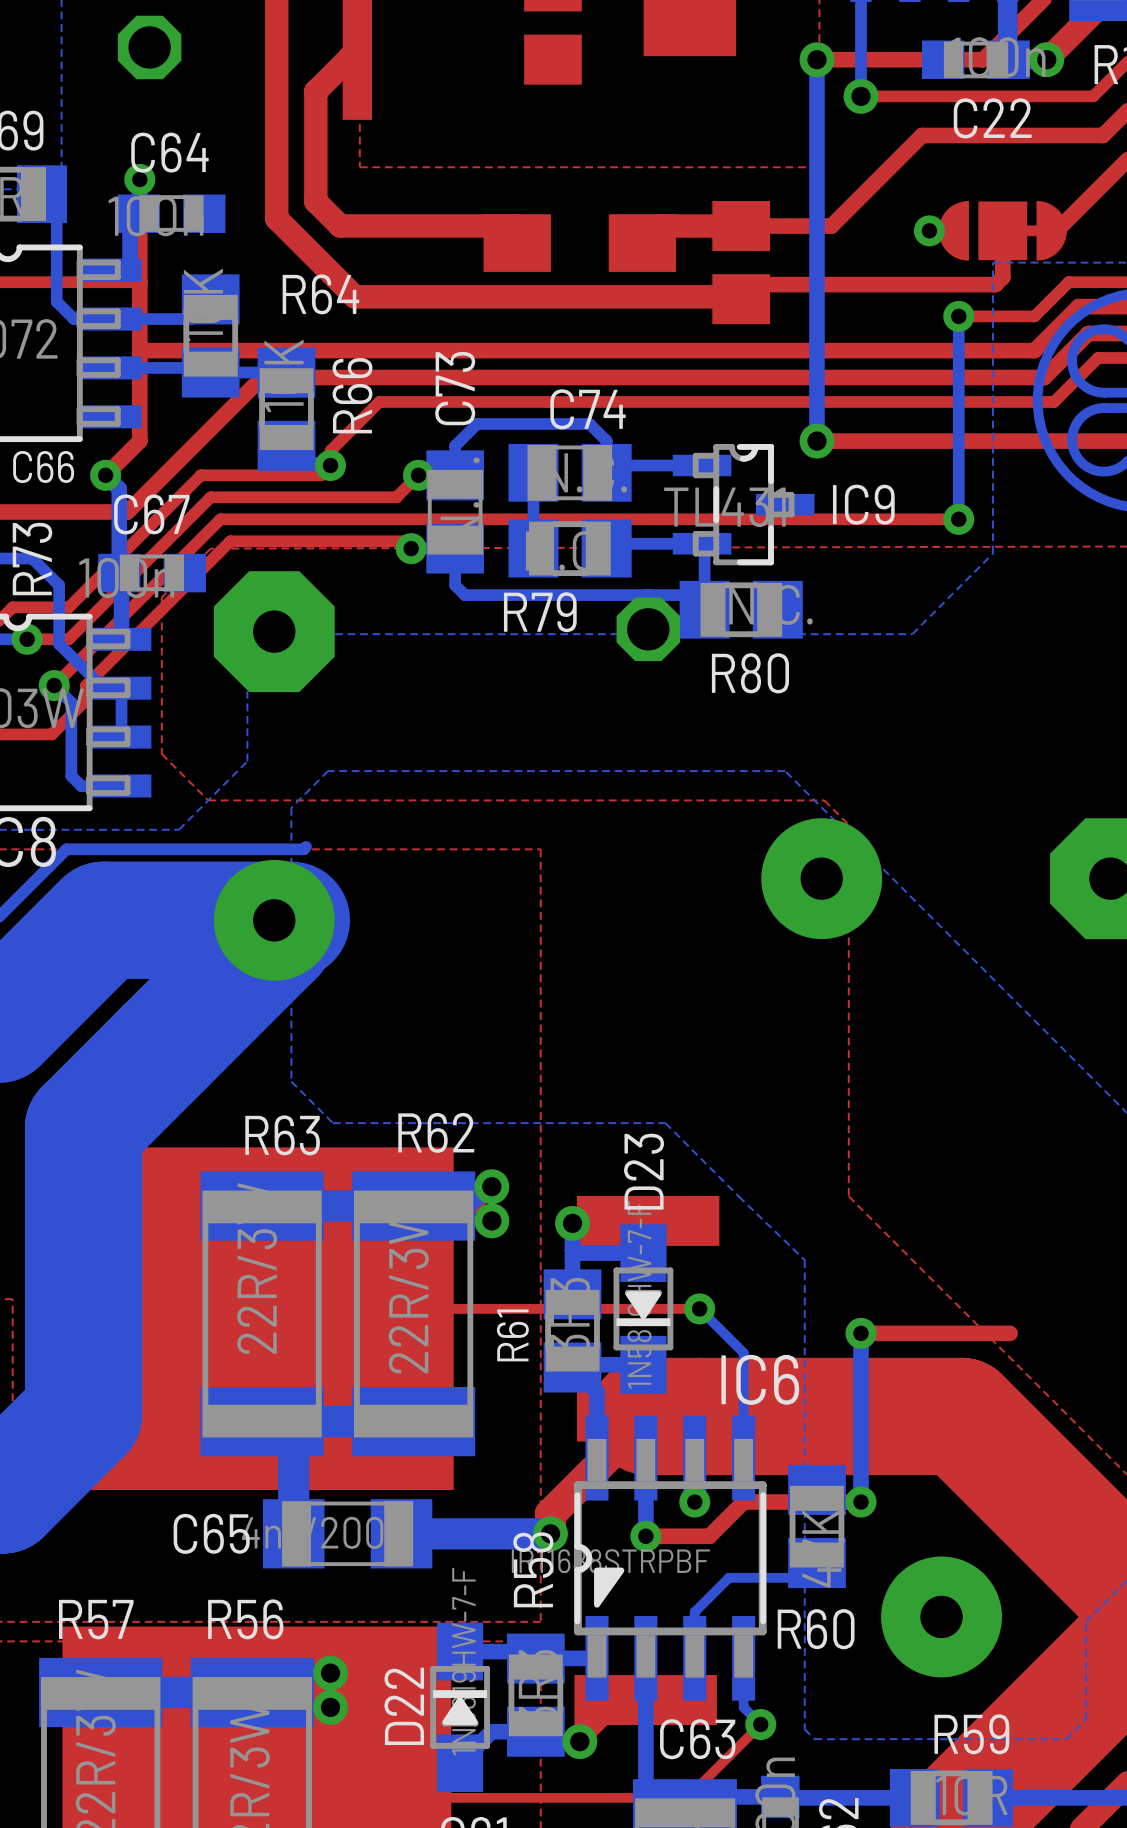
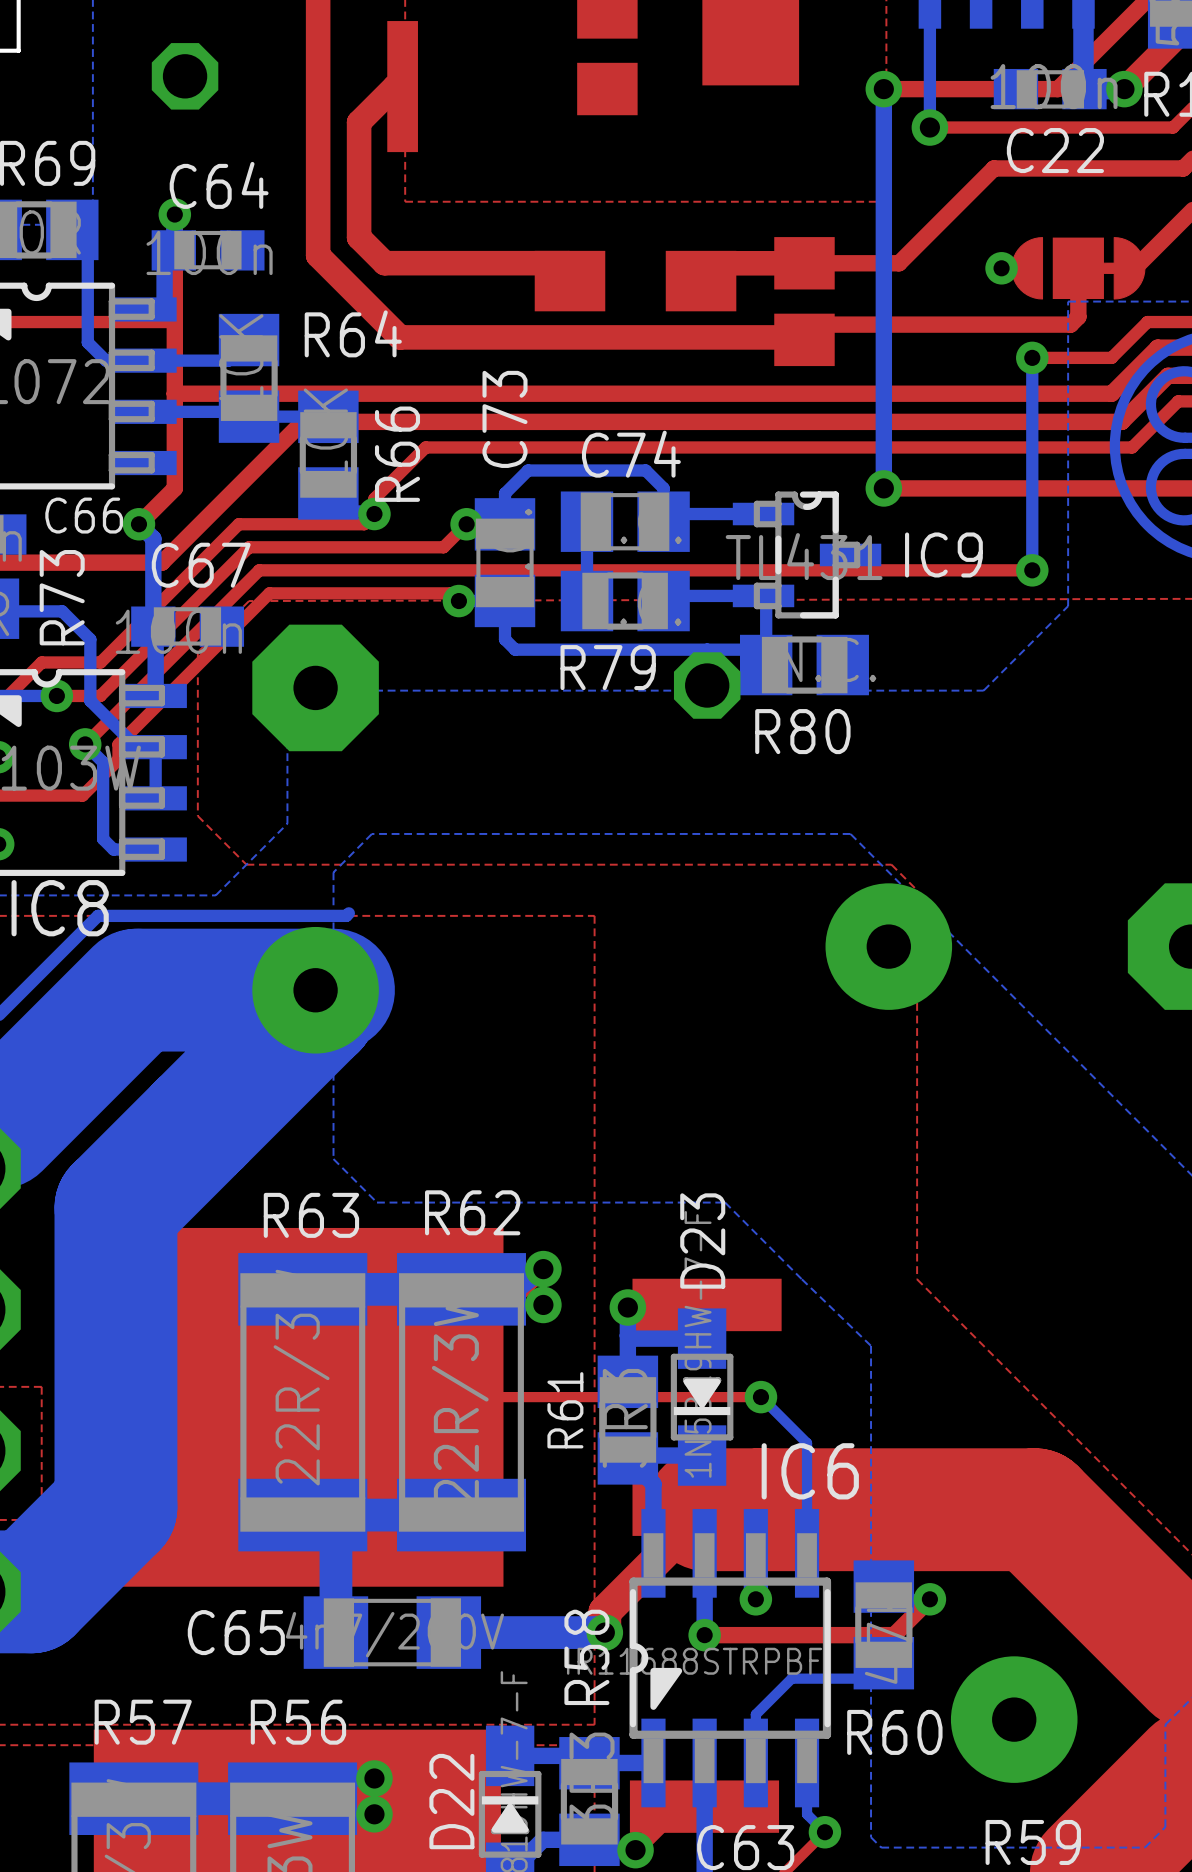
bottom track: (860, 1333) (860, 1502) -> none
via: (860, 1333) -> none
top track: (1010, 1333) (860, 1333) -> none
top track: (860, 1502) (743, 1502) (709, 1536) -> (929, 1599) (894, 1635) (771, 1635)

